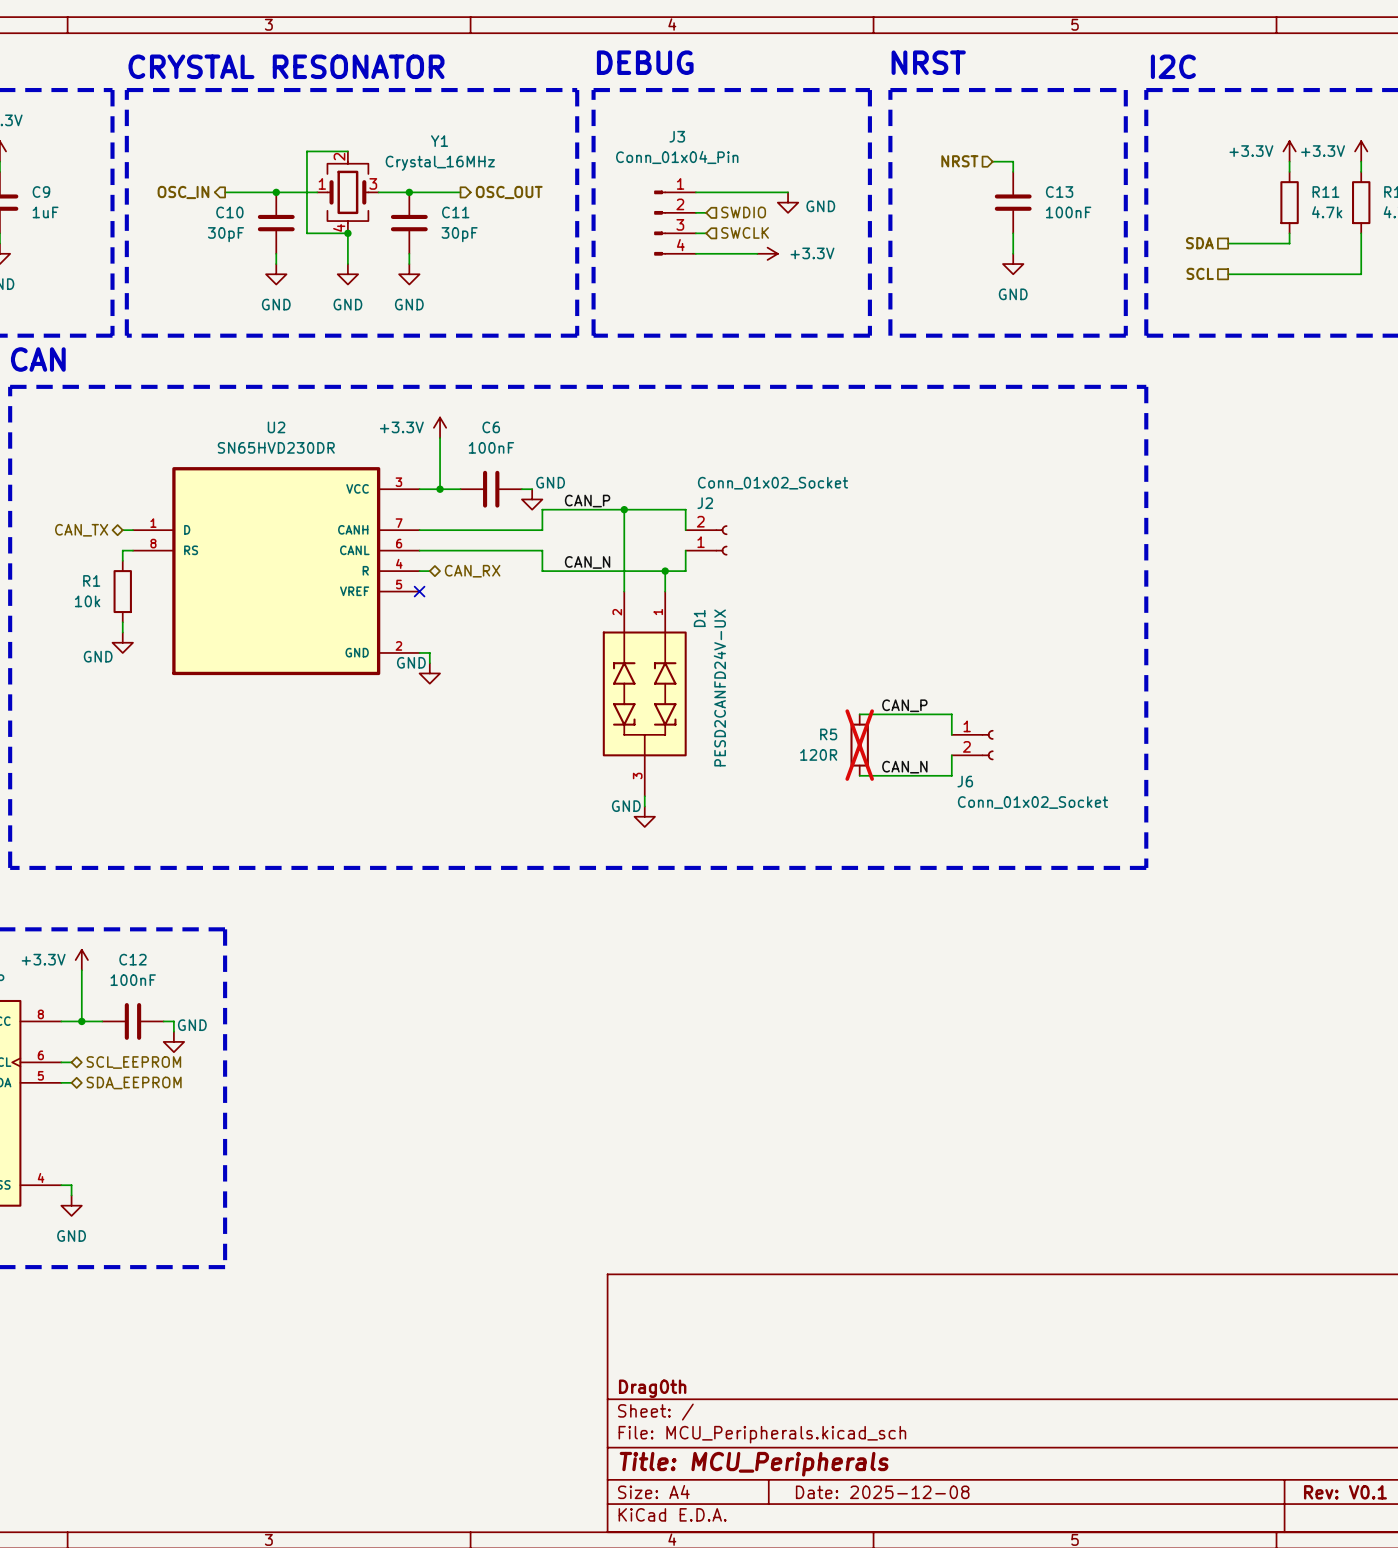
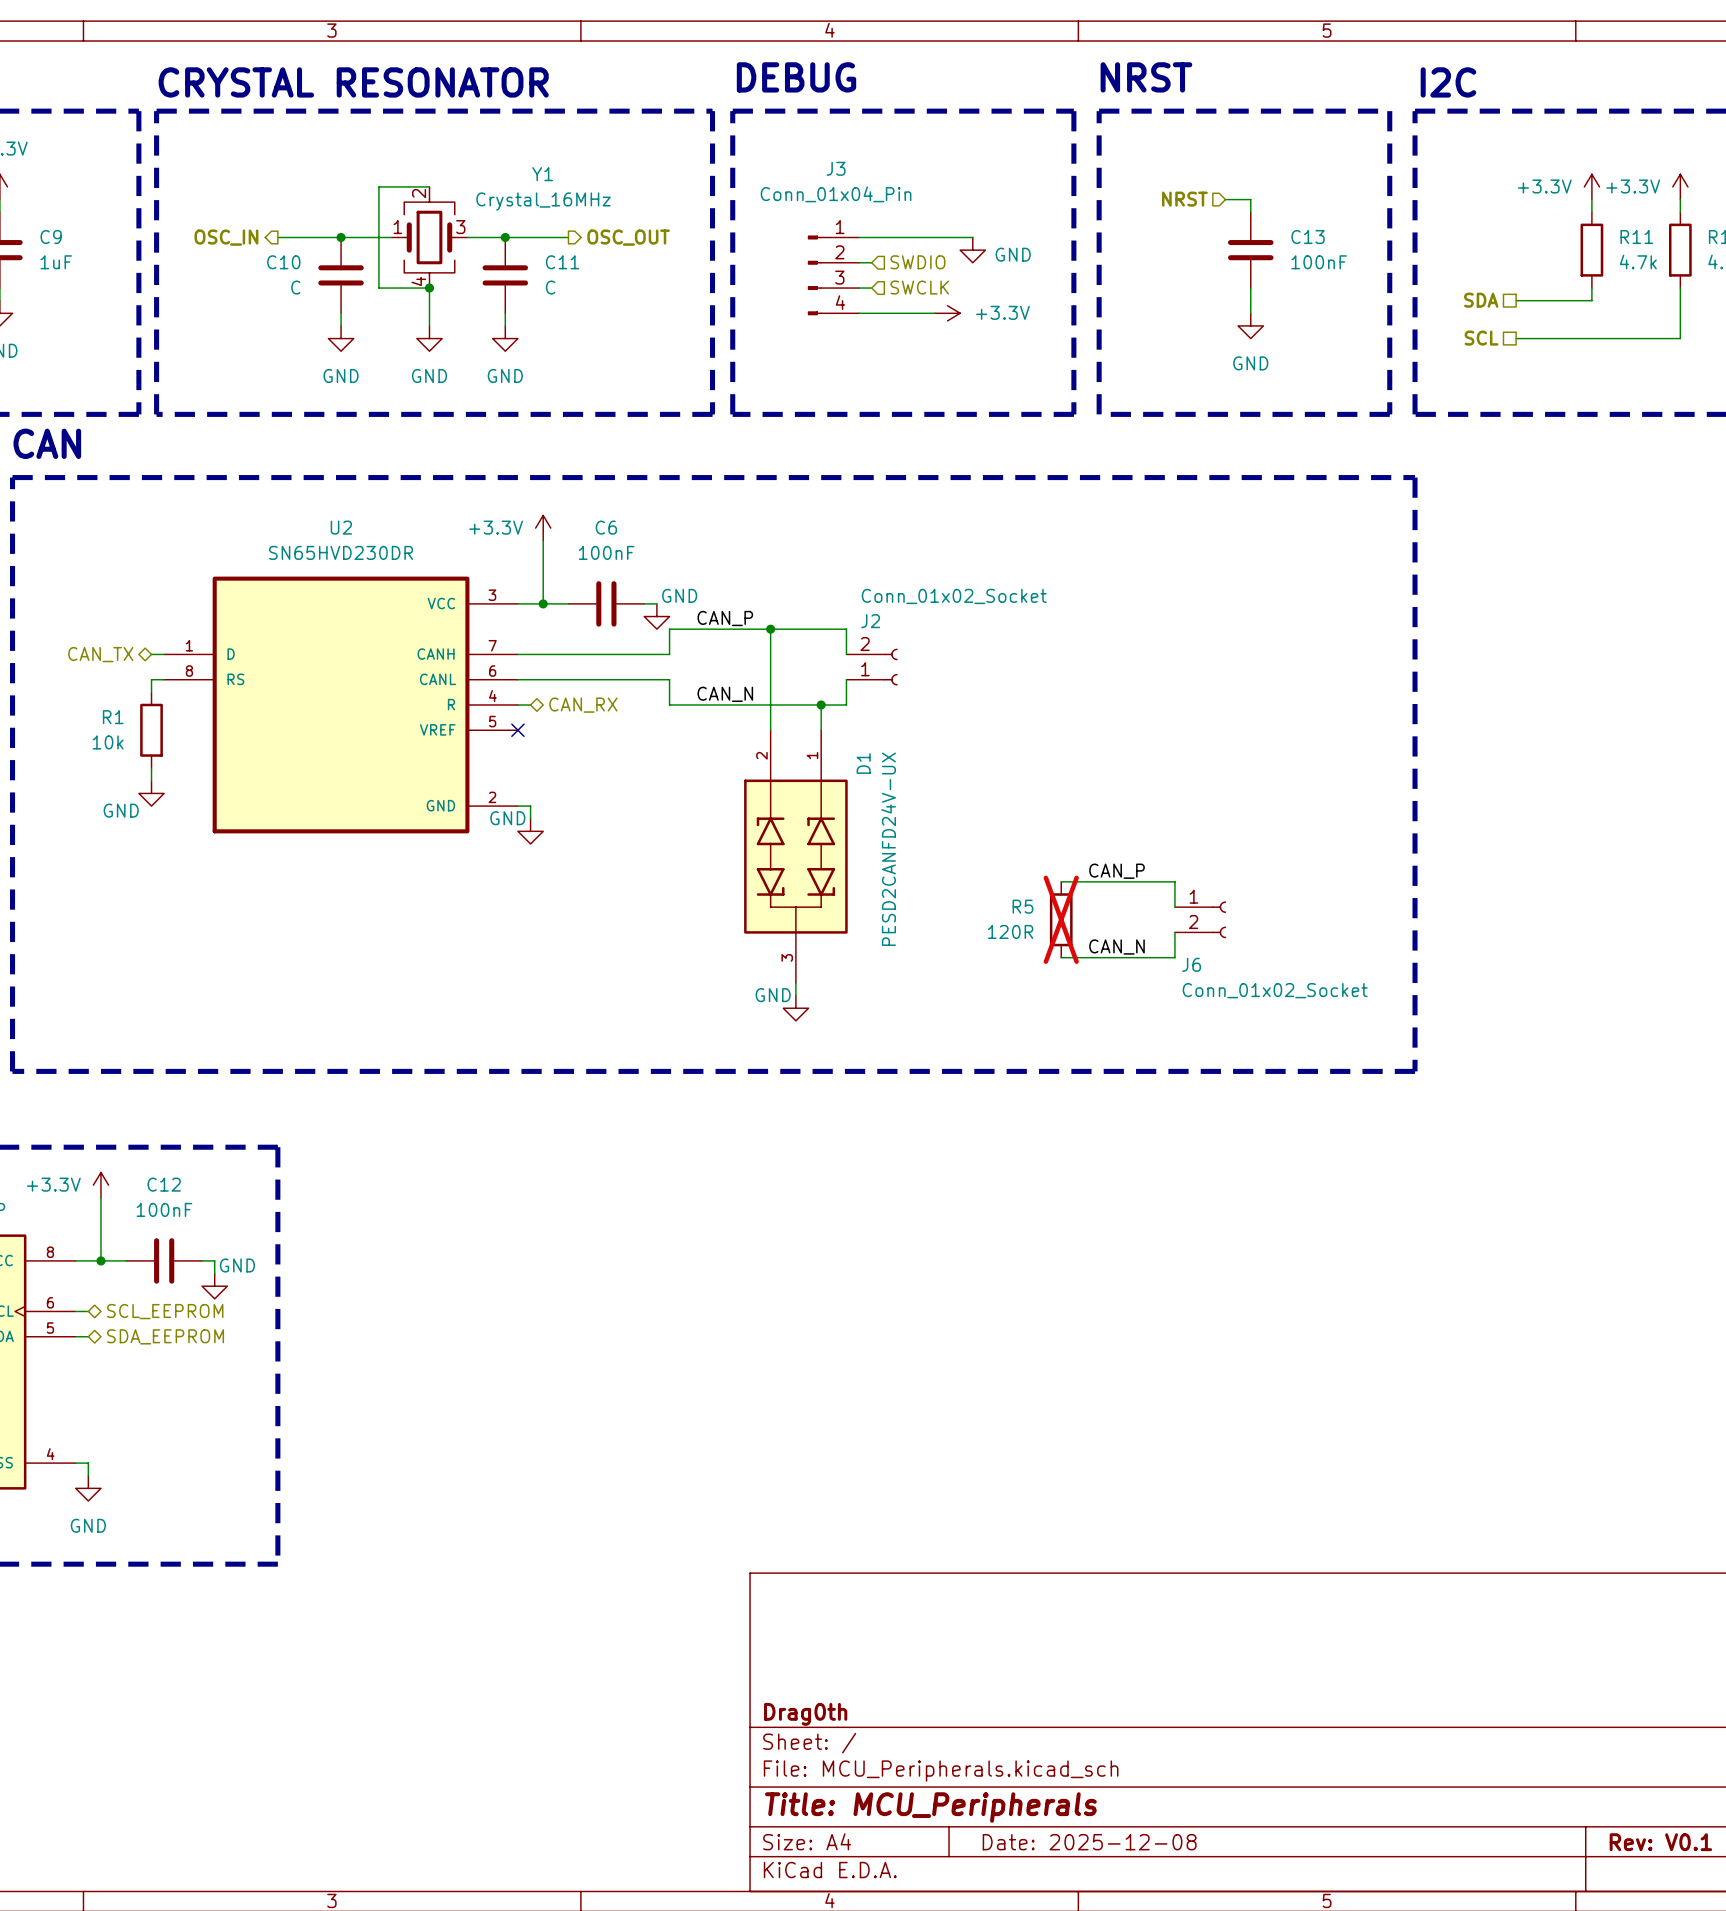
C10 value: 30pF (225, 234) -> C (295, 287)
C11 value: 30pF (459, 234) -> C (550, 287)

